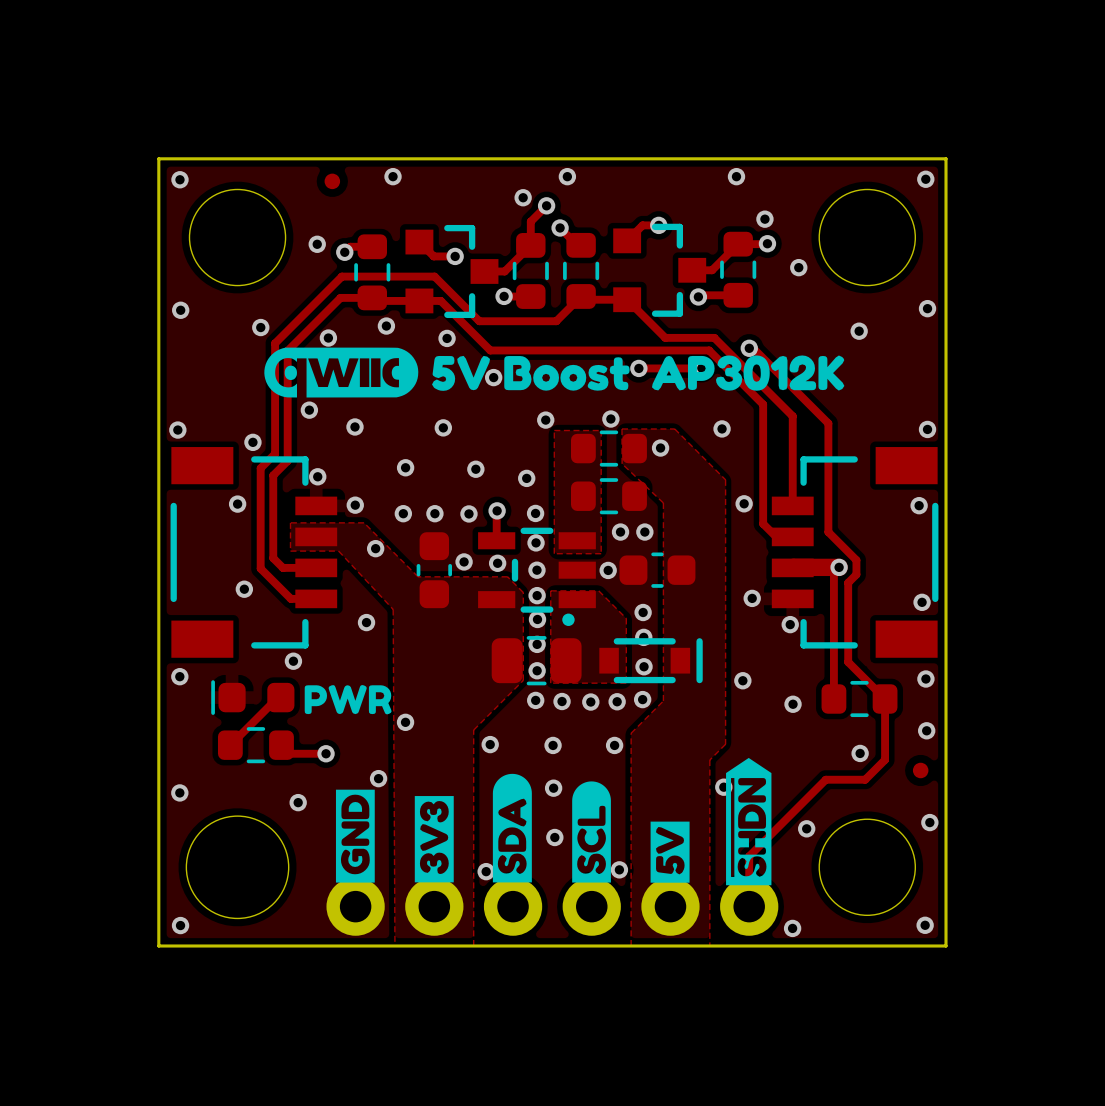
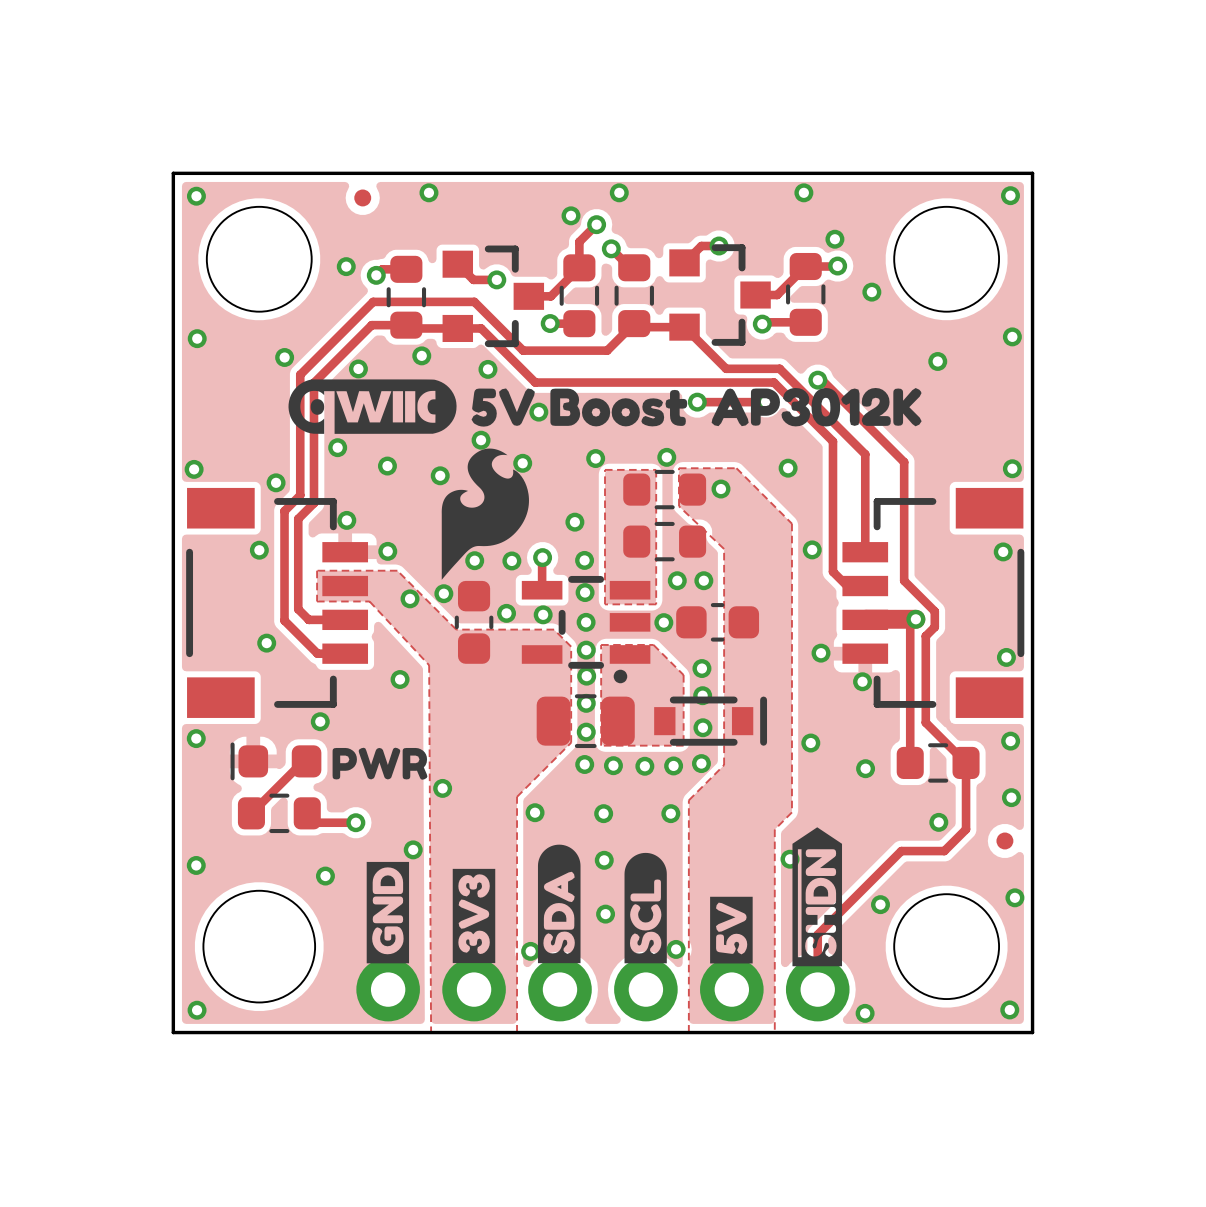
via: none -> (481, 440)
drawing: none -> [441, 448, 529, 580]
via: none -> (522, 463)
via: (443, 427) -> none
via: none -> (440, 475)
via: (405, 467) -> none
via: (475, 469) -> none
via position: (403, 513) -> (443, 593)

